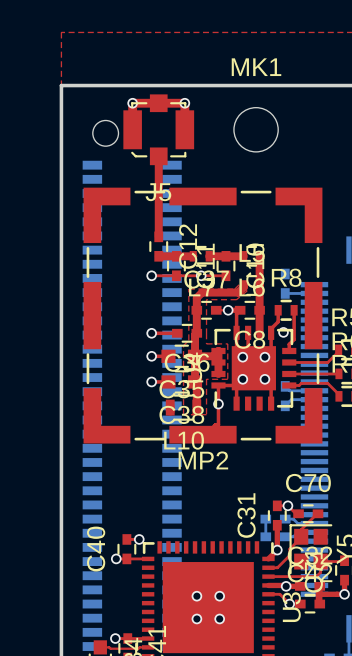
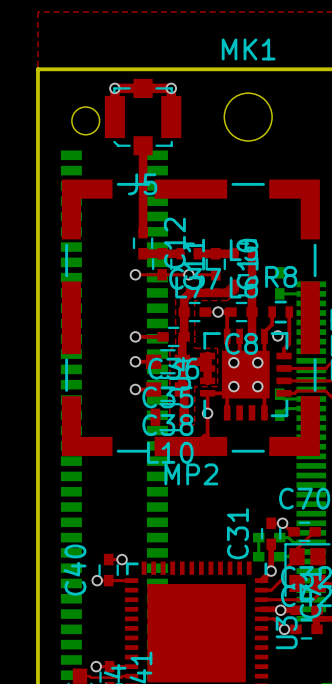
via: (196, 596) -> none
via: (219, 596) -> none
via: (196, 618) -> none
via: (219, 618) -> none

